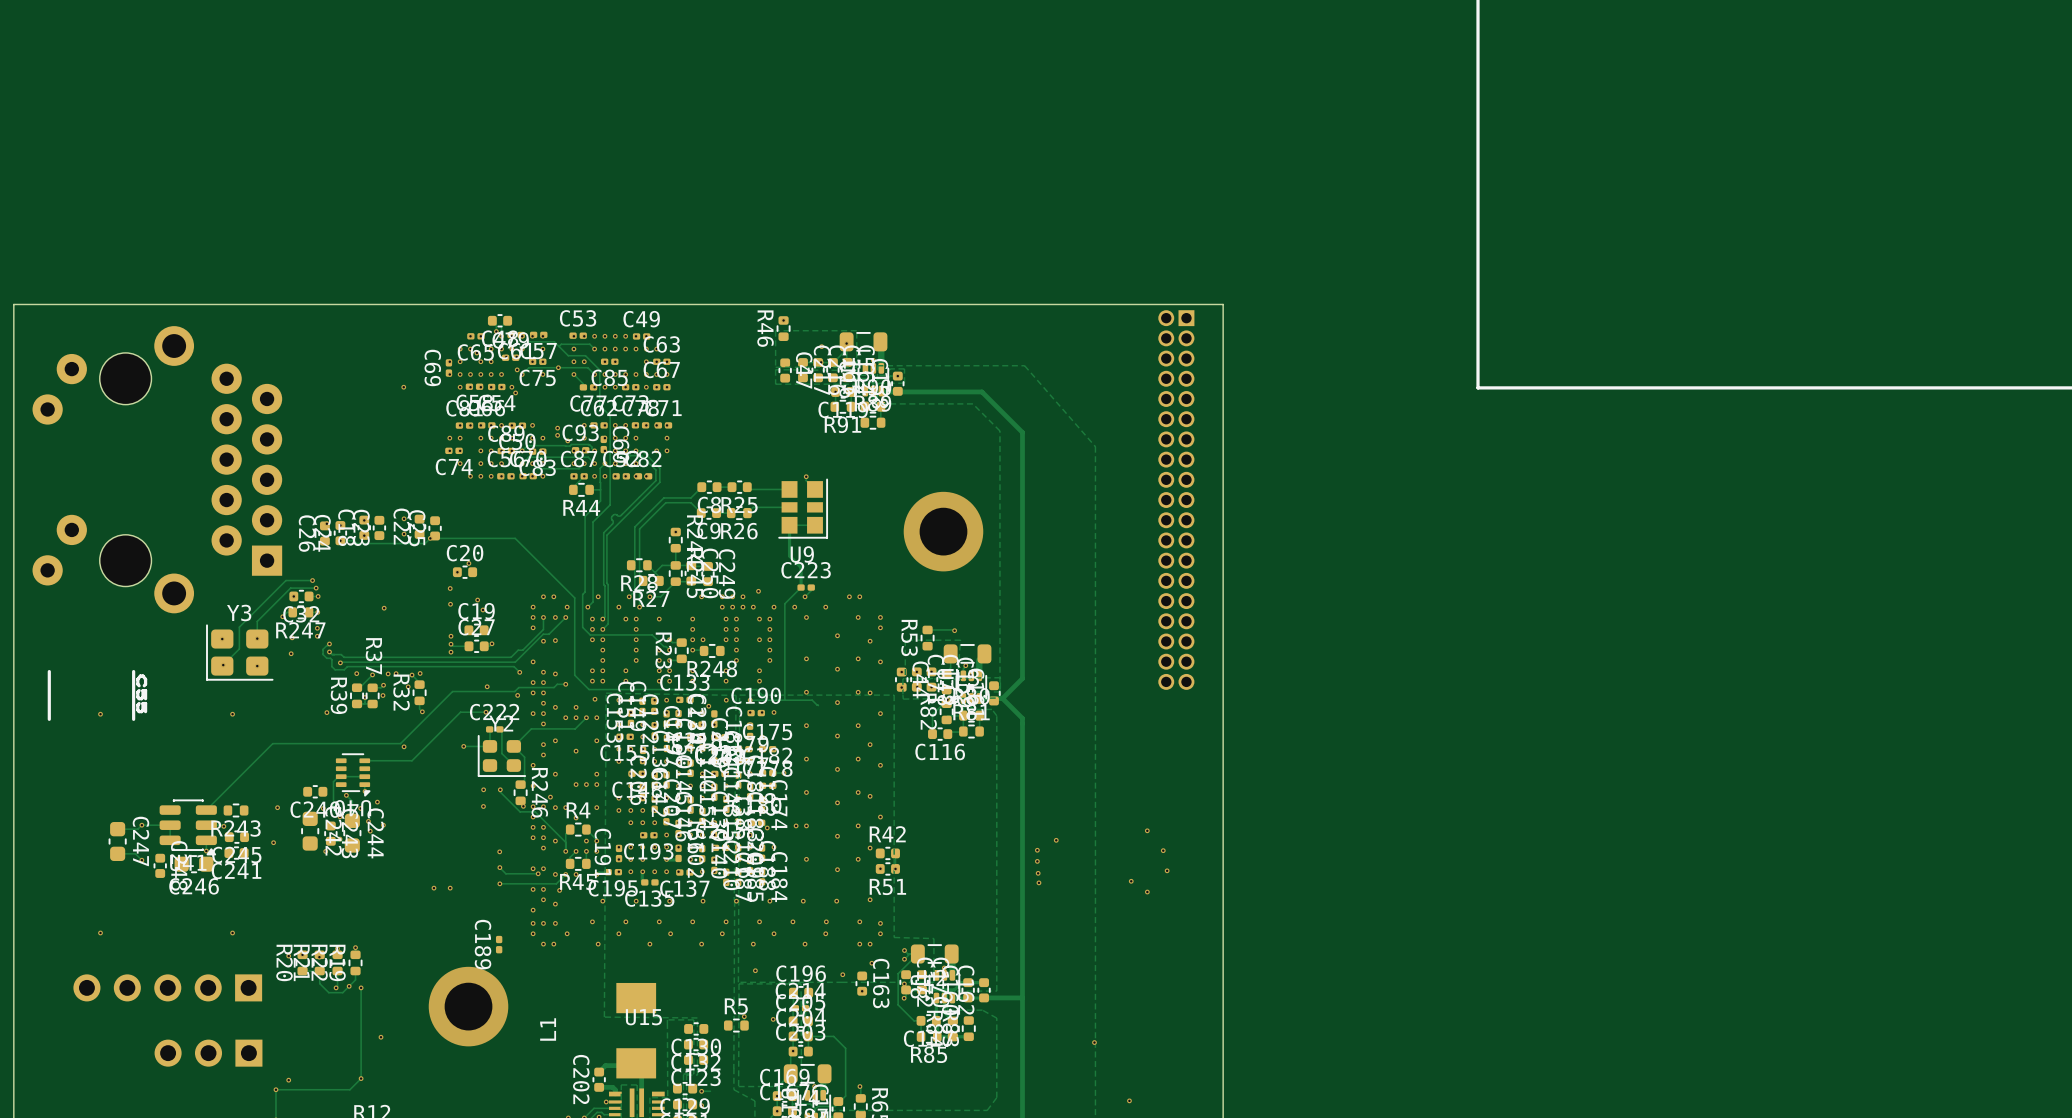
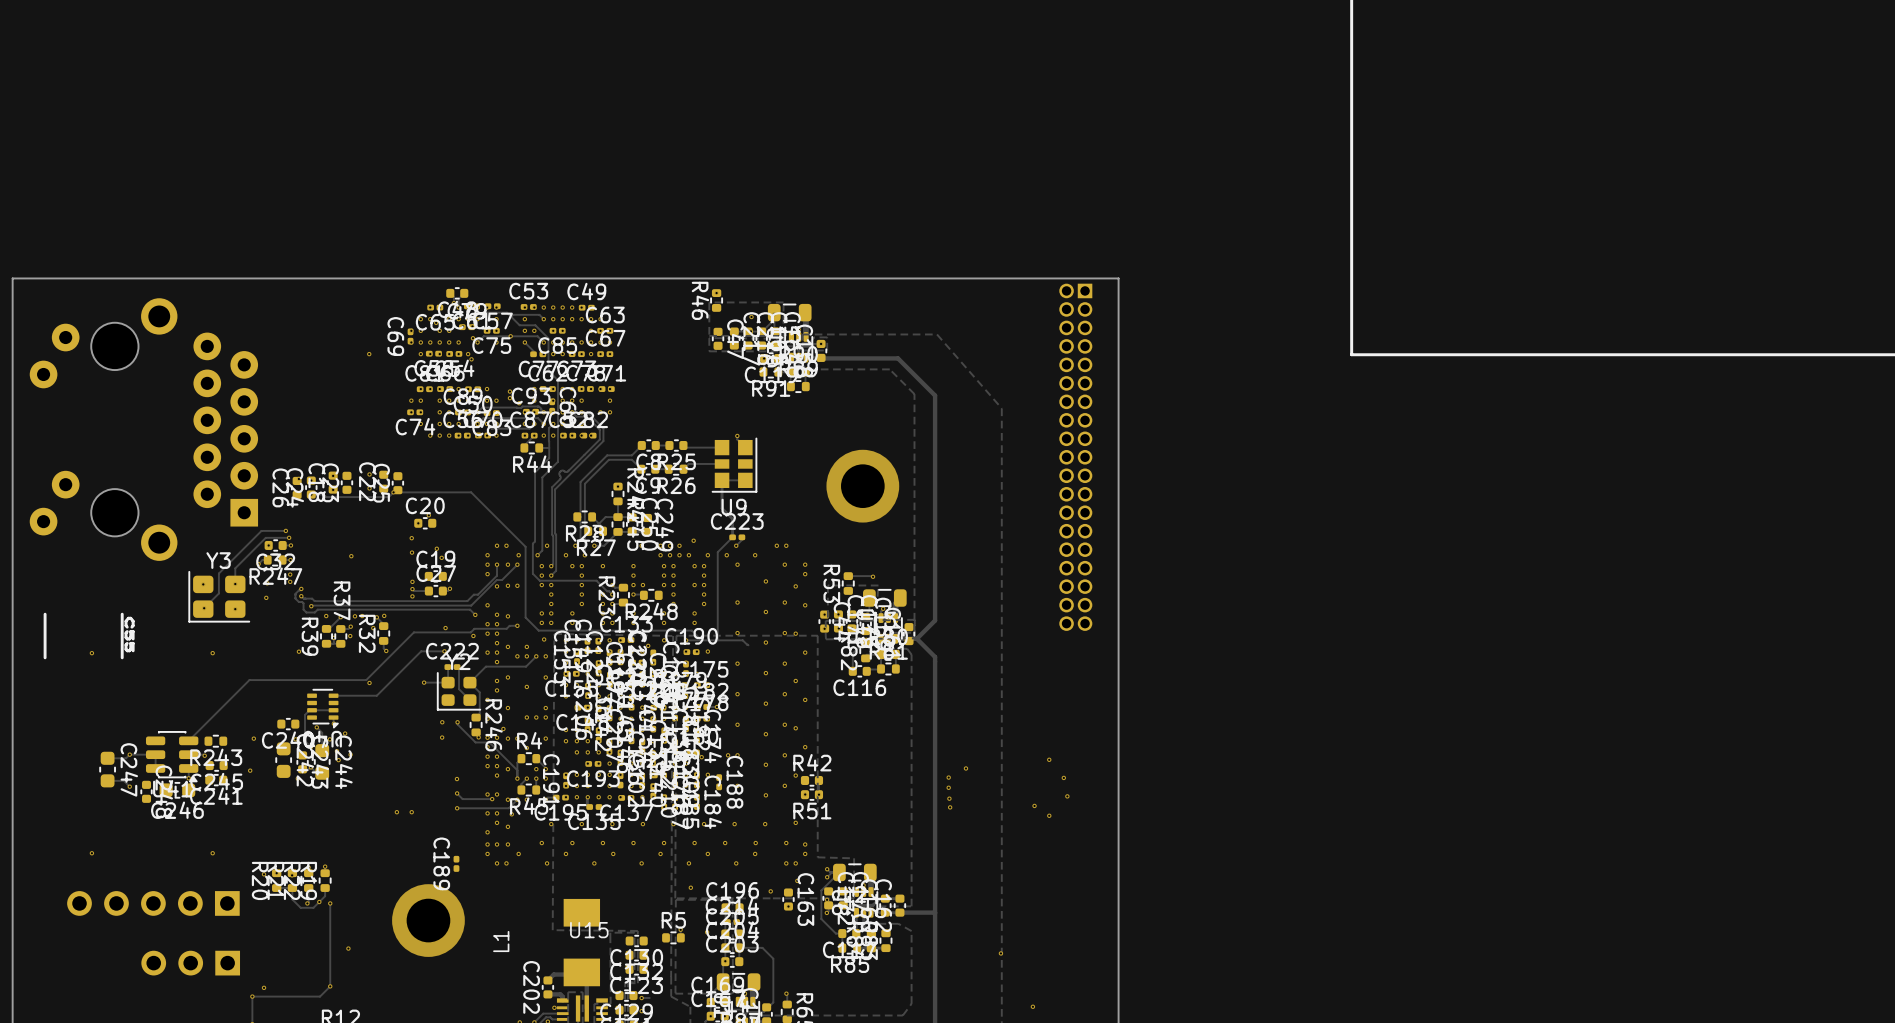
via: none -> (517, 585)
C188 position: (750, 865) -> (719, 782)

